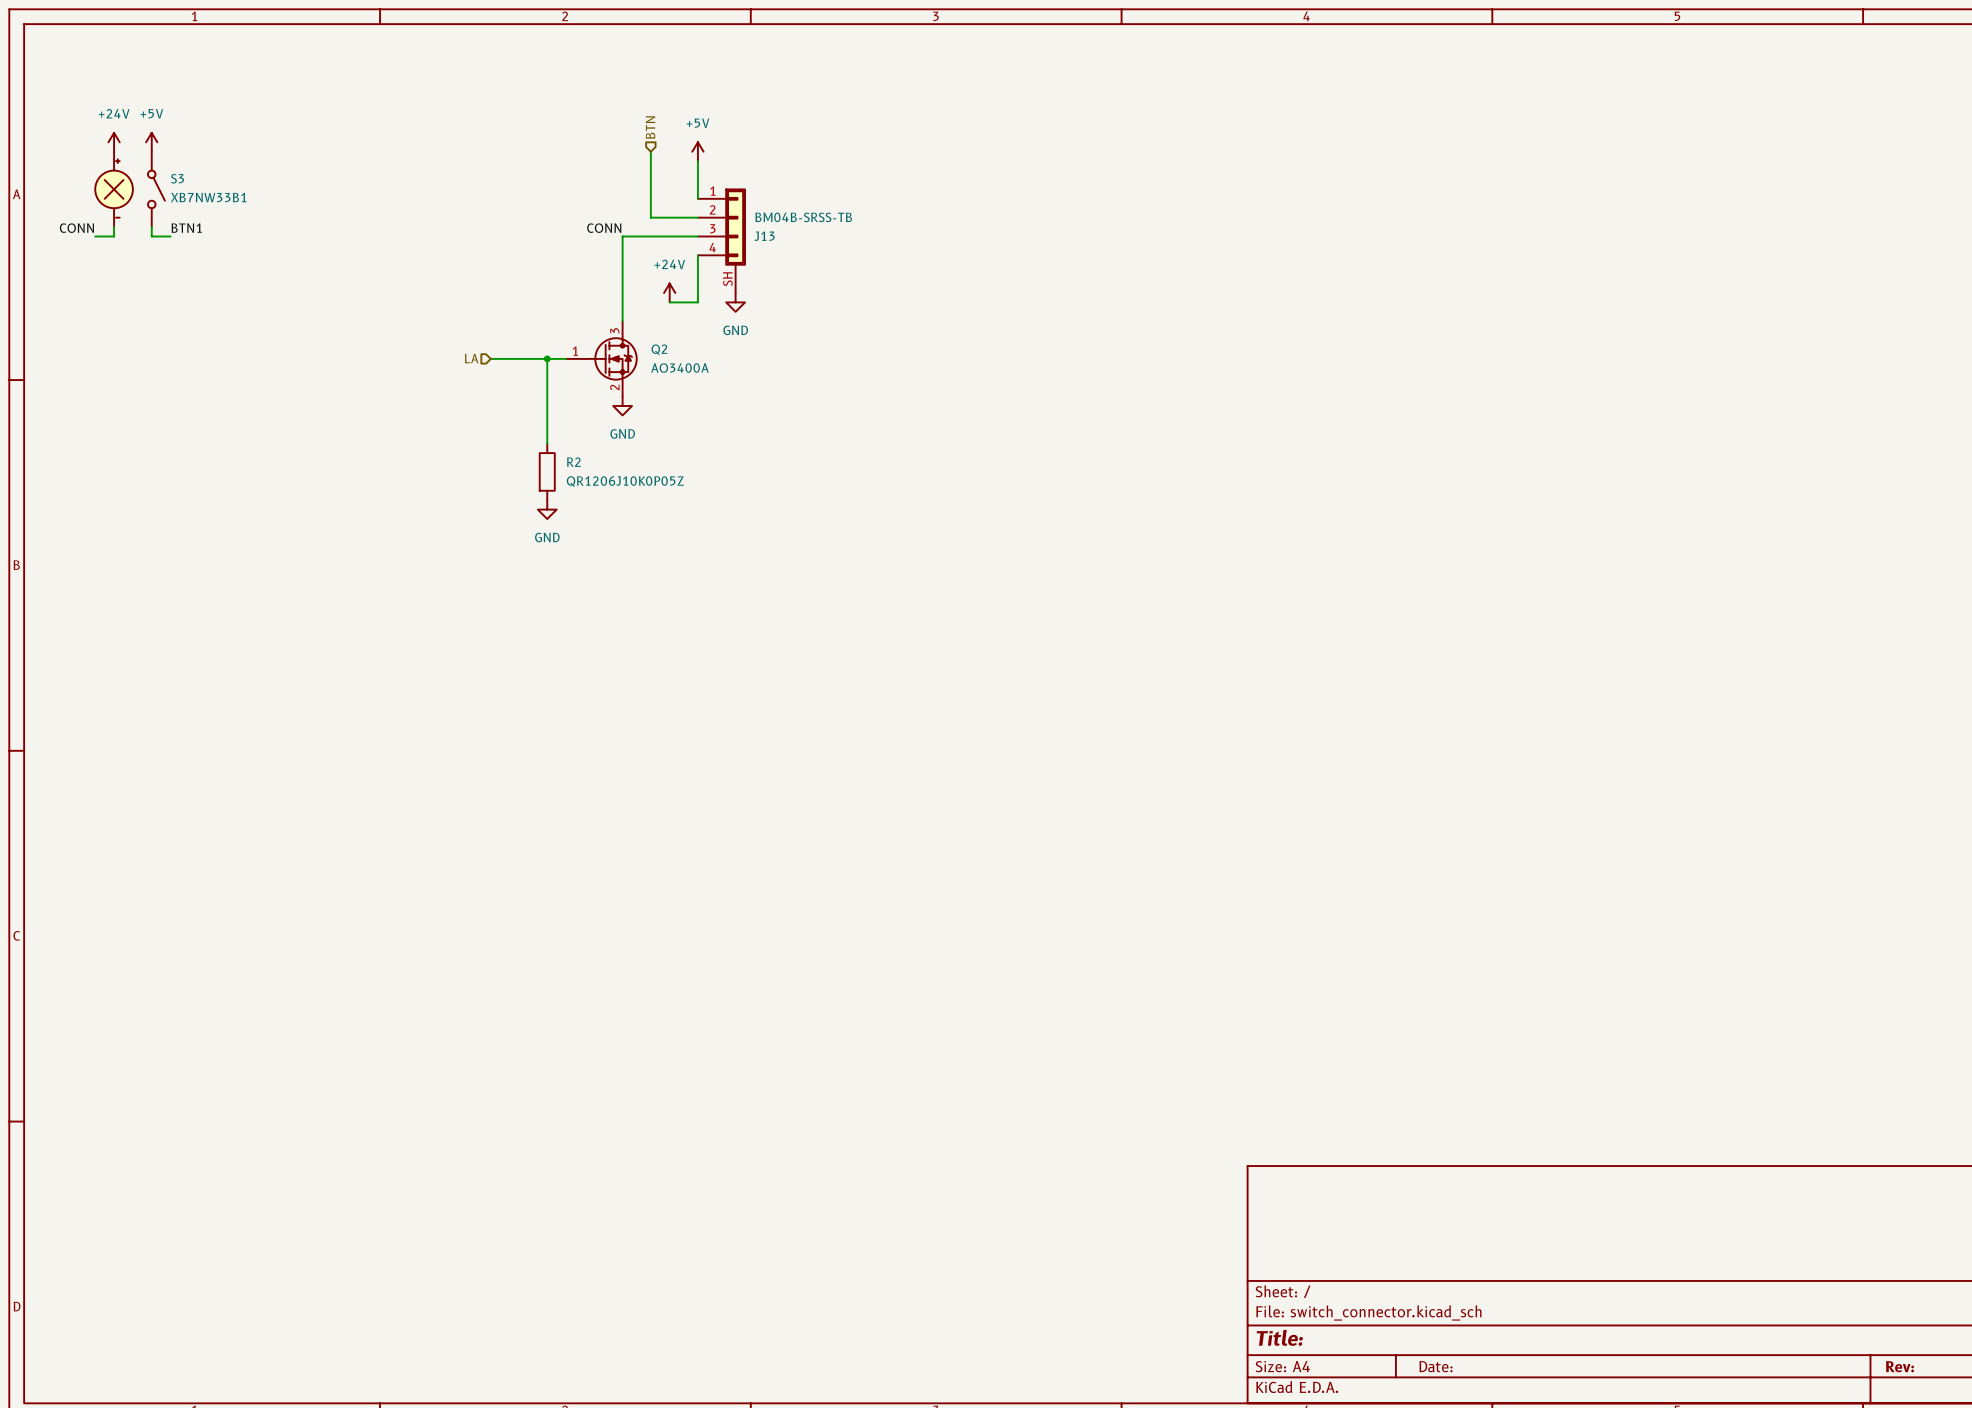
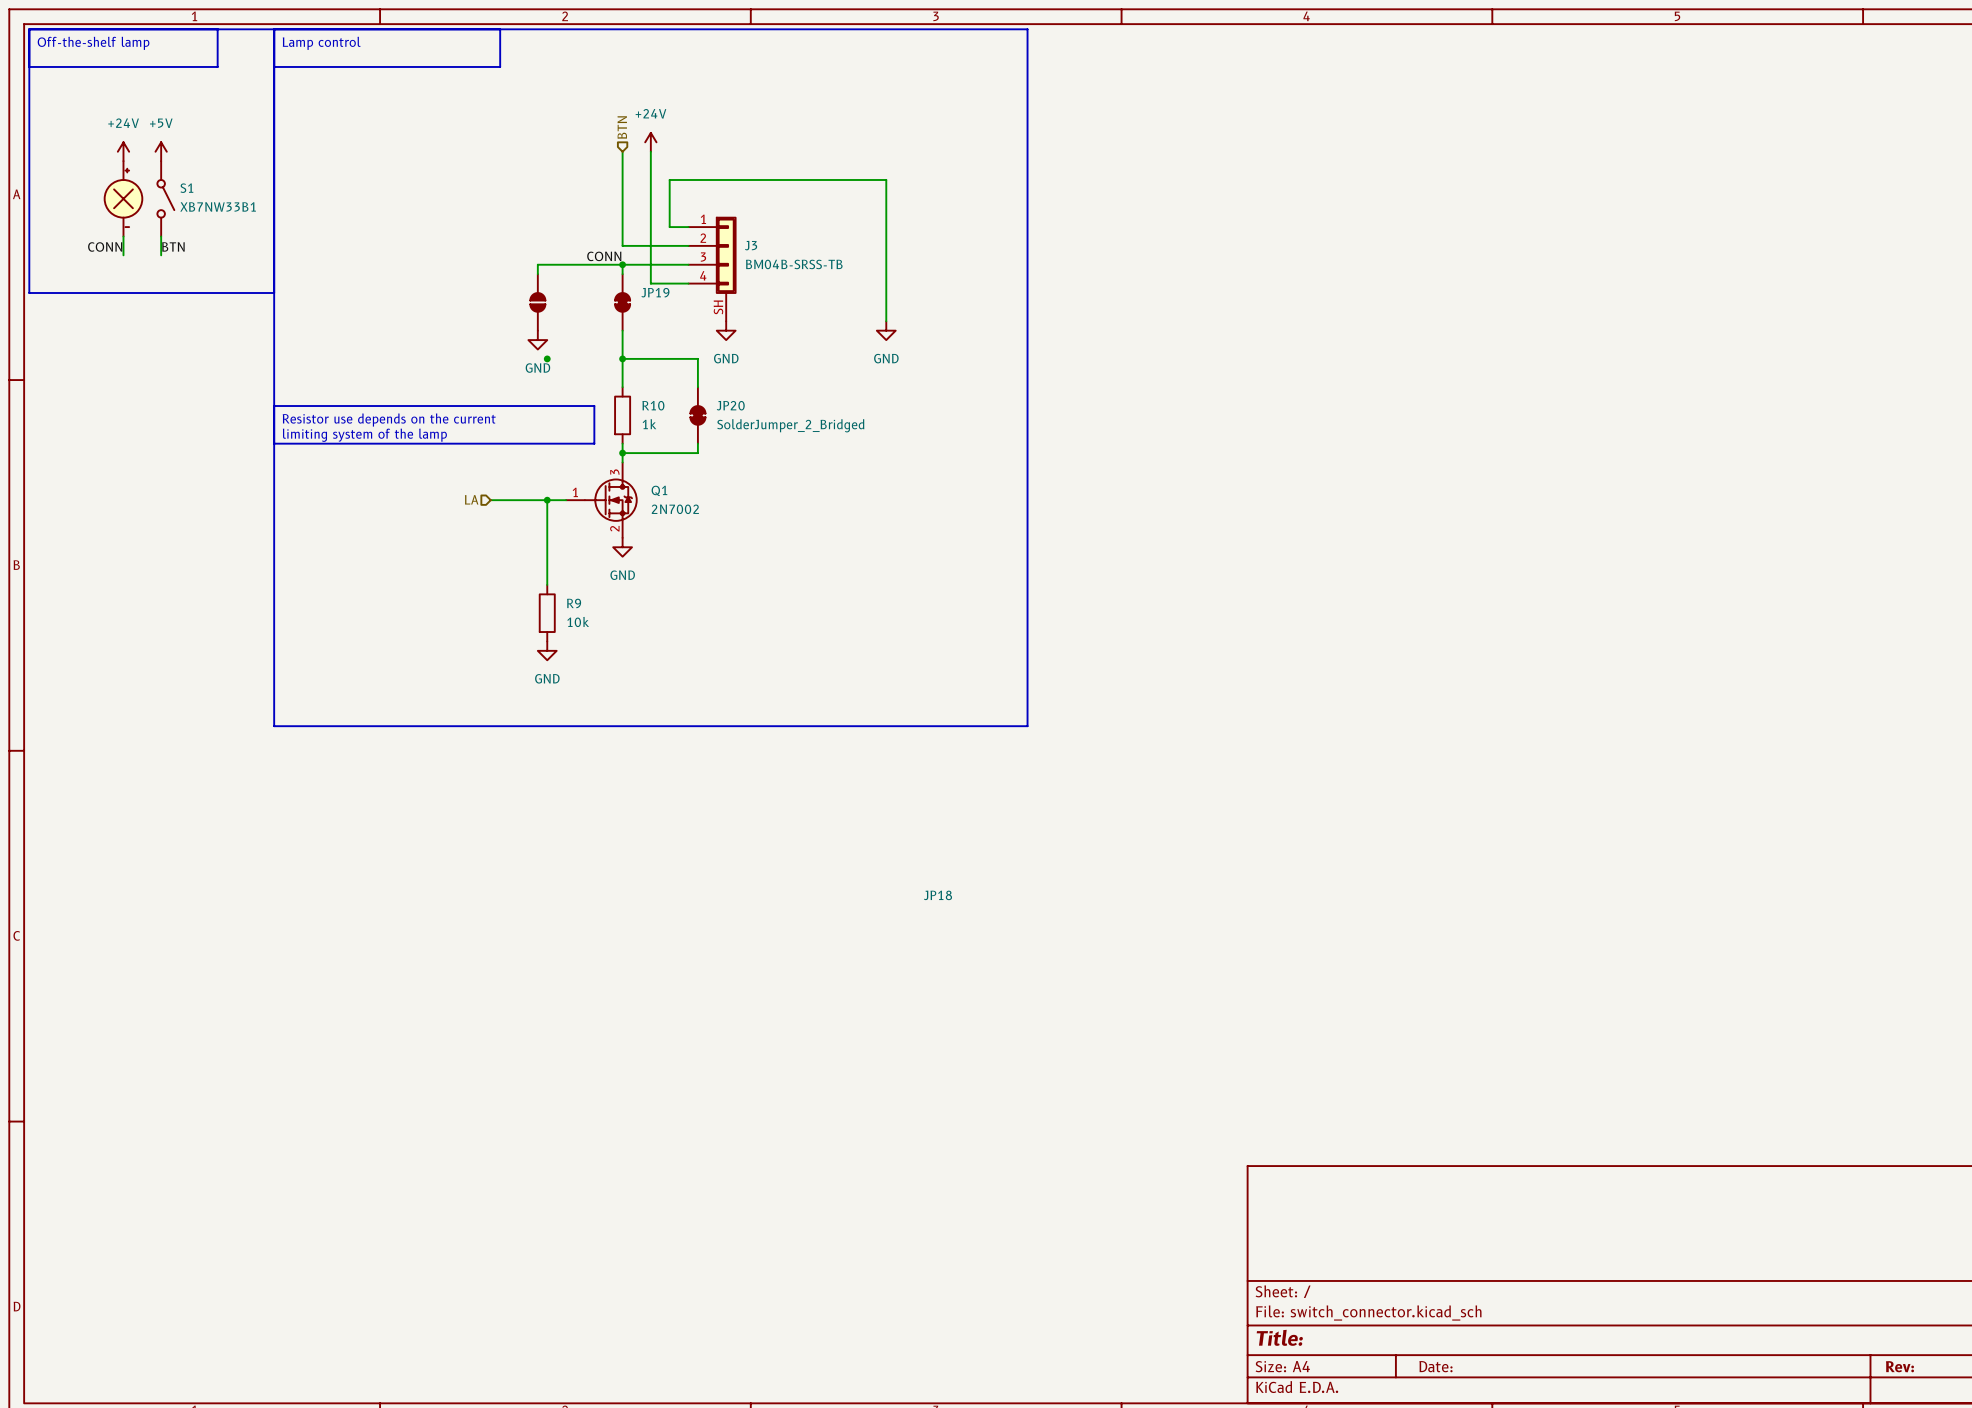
line: none -> (217, 29) (217, 66) (29, 66)
line: none -> (274, 29) (274, 726) (1027, 726) (1027, 29) (29, 29) (29, 292) (274, 292)
line: none -> (500, 29) (500, 66) (274, 66)
text: none -> Off-the-shelf lamp (93, 43)
text: none -> Lamp control (321, 43)
hierarchical label position: BTN (650, 127) -> BTN (622, 127)
power symbol position: +24V (114, 142) -> +24V (123, 151)
power symbol position: +5V (151, 142) -> +5V (161, 151)
power symbol: +5V (697, 151) -> none
wire: (697, 161) (697, 198) -> none
S3: XB7NW33B1 (129, 189) -> none
S1: none -> XB7NW33B1 (139, 198)
wire: (650, 217) (697, 217) -> (650, 217) (650, 283) (688, 283)
wire: (114, 227) (114, 236) (95, 236) -> none
wire: (151, 227) (151, 236) (170, 236) -> none
wire: none -> (688, 227) (669, 227) (669, 179) (886, 179) (886, 321)
label position: CONN (76, 228) -> CONN (105, 246)
label: BTN1 (186, 228) -> BTN (173, 246)
label position: CONN (604, 228) -> CONN (604, 256)
wire: none -> (123, 236) (123, 255)
wire: none -> (161, 236) (161, 255)
wire: (622, 236) (697, 236) -> (622, 236) (622, 151)
J13: BM04B-SRSS-TB (721, 240) -> none
wire: (622, 245) (622, 264) -> (622, 245) (688, 245)
wire: (697, 255) (697, 302) (669, 302) -> none
junction: none -> (622, 264)
wire: none -> (688, 264) (537, 264) (537, 274)
J3: none -> BM04B-SRSS-TB (712, 269)
power symbol position: +24V (669, 292) -> +24V (650, 142)
JP18: none -> (537, 302)
JP19: none -> (622, 302)
power symbol position: GND (735, 302) -> GND (726, 330)
power symbol: none -> GND (886, 330)
power symbol: none -> GND (537, 340)
hierarchical label position: LA (471, 358) -> LA (471, 499)
wire: (490, 358) (566, 358) -> (490, 500) (566, 500)
wire: (547, 358) (547, 443) -> (547, 500) (547, 584)
Q2: AO3400A (601, 358) -> none
wire: none -> (622, 358) (697, 358) (697, 387)
junction: none -> (622, 358)
line: none -> (274, 406) (594, 406) (594, 443) (274, 443)
power symbol: GND (622, 406) -> none
R10: none -> 1k (622, 415)
JP20: none -> SolderJumper_2_Bridged (697, 415)
text: none -> Resistor use depends on the current (389, 420)
text: none -> limiting system of the lamp (364, 435)
wire: none -> (622, 443) (622, 462)
wire: none -> (697, 443) (697, 453) (622, 453)
junction: none -> (622, 453)
R2: QR1206J10K0P05Z (547, 471) -> none
junction: none -> (547, 500)
Q1: none -> 2N7002 (601, 500)
power symbol: GND (547, 509) -> none
power symbol: none -> GND (622, 547)
R9: none -> 10k (547, 613)
power symbol: none -> GND (547, 650)

